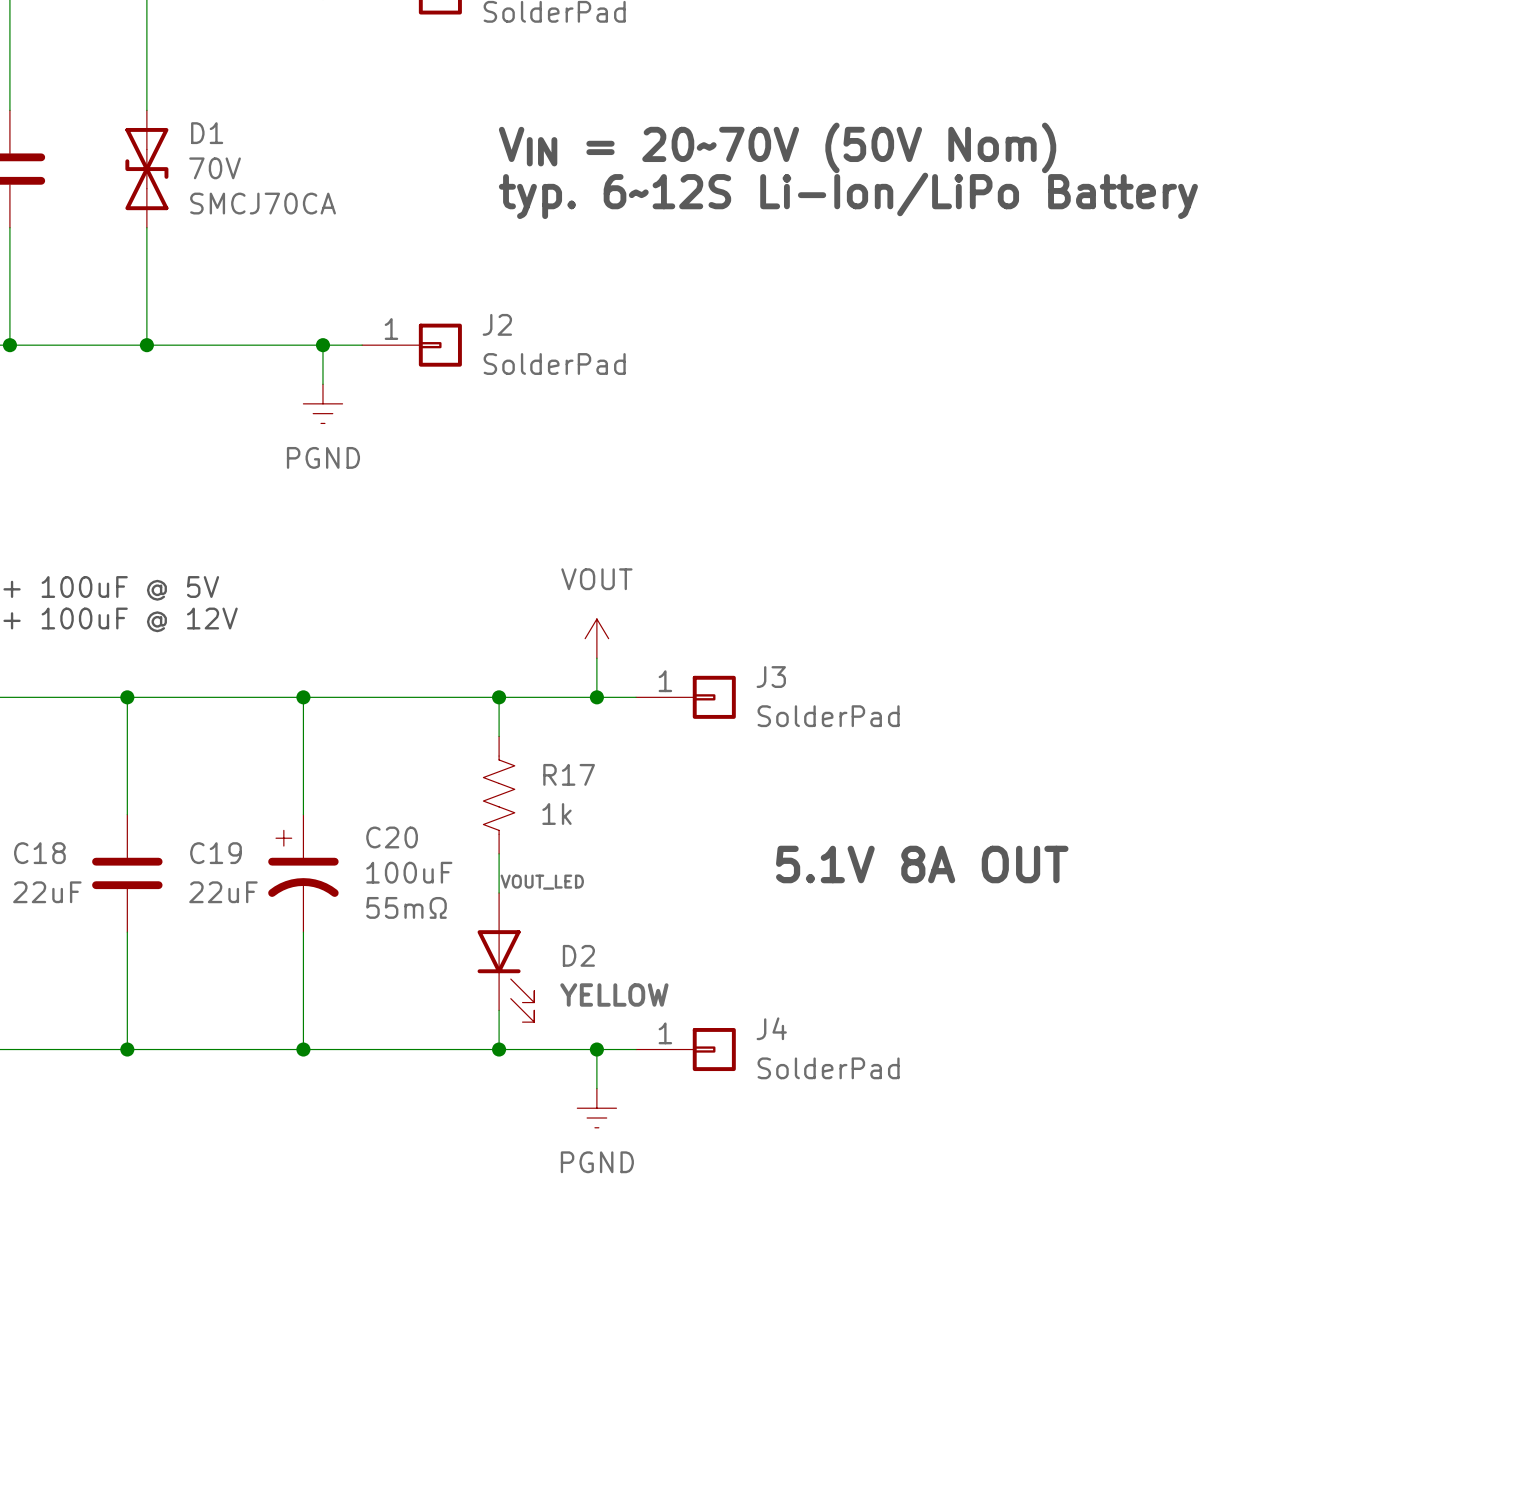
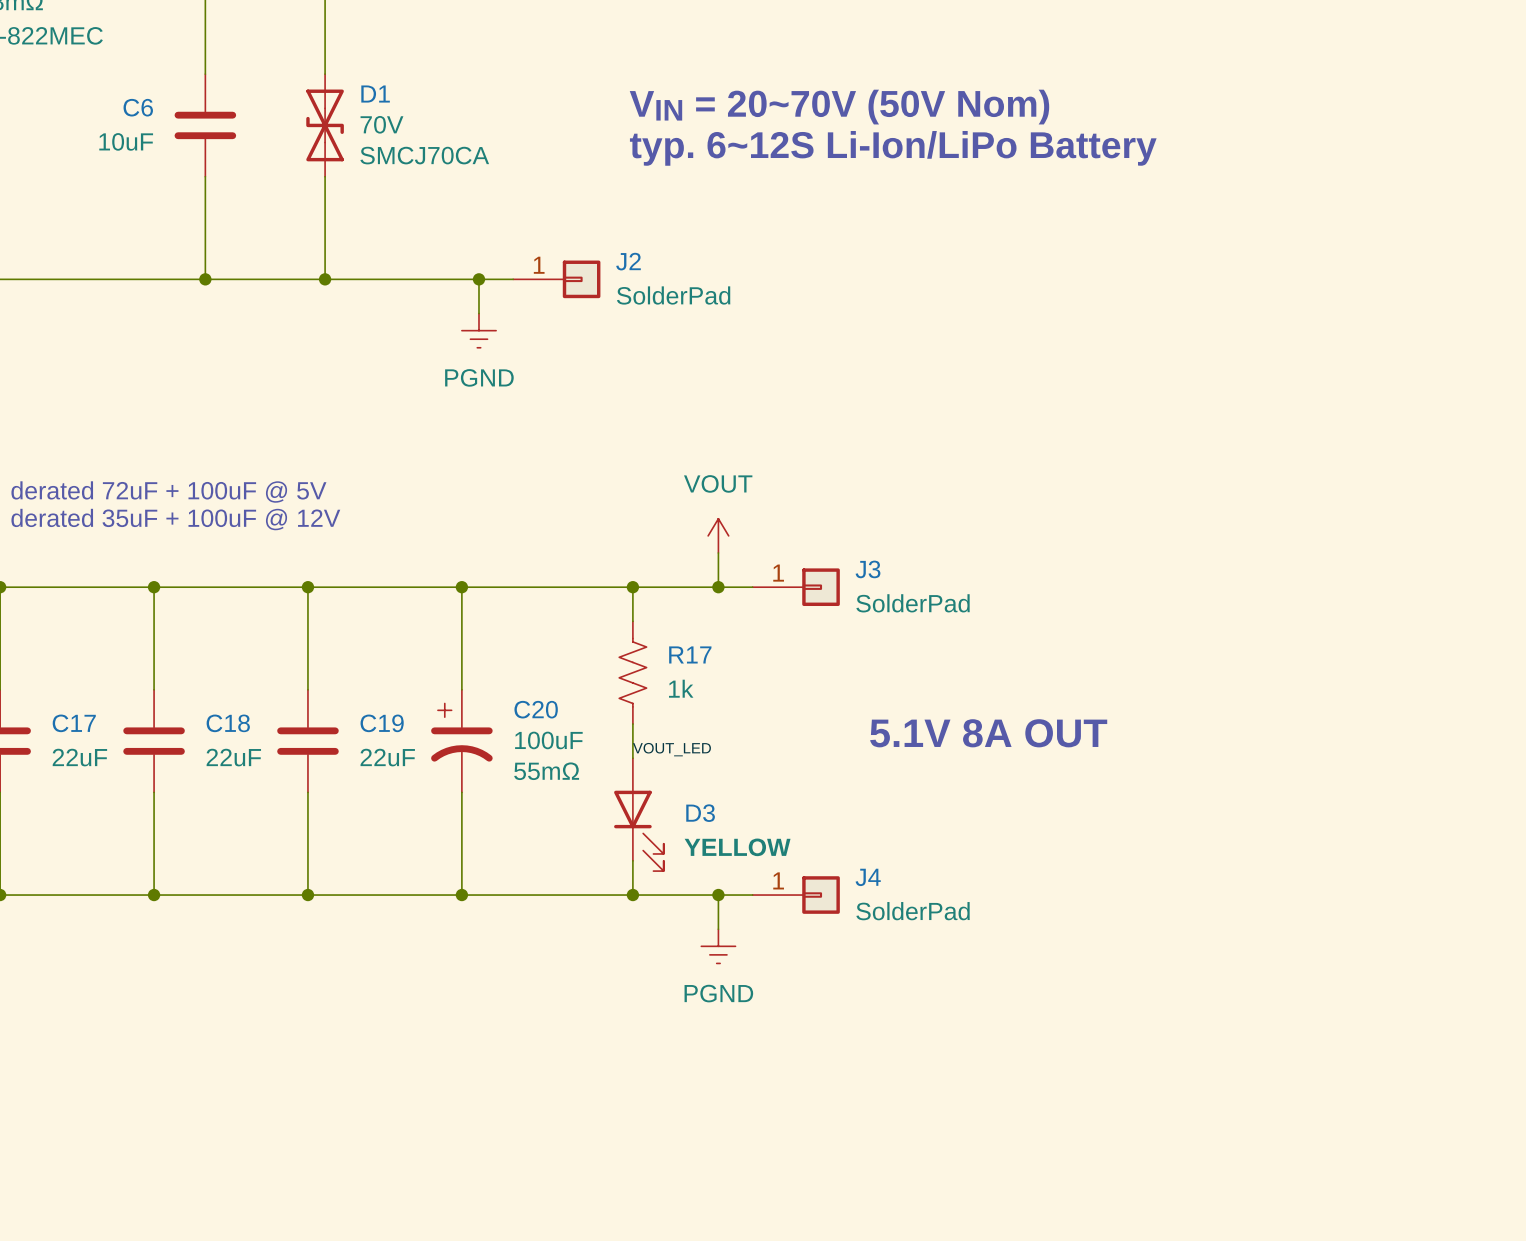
D2 name: D2 (578, 955) -> D3 (700, 813)

